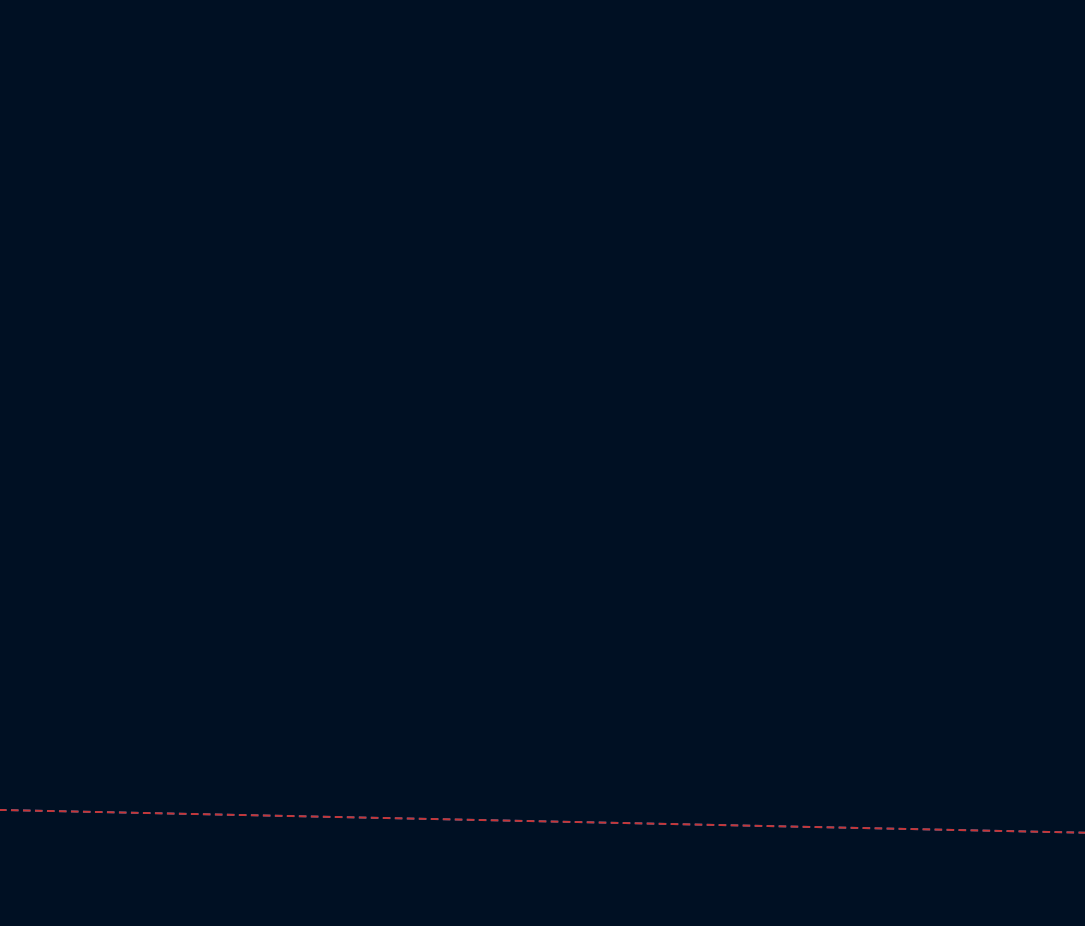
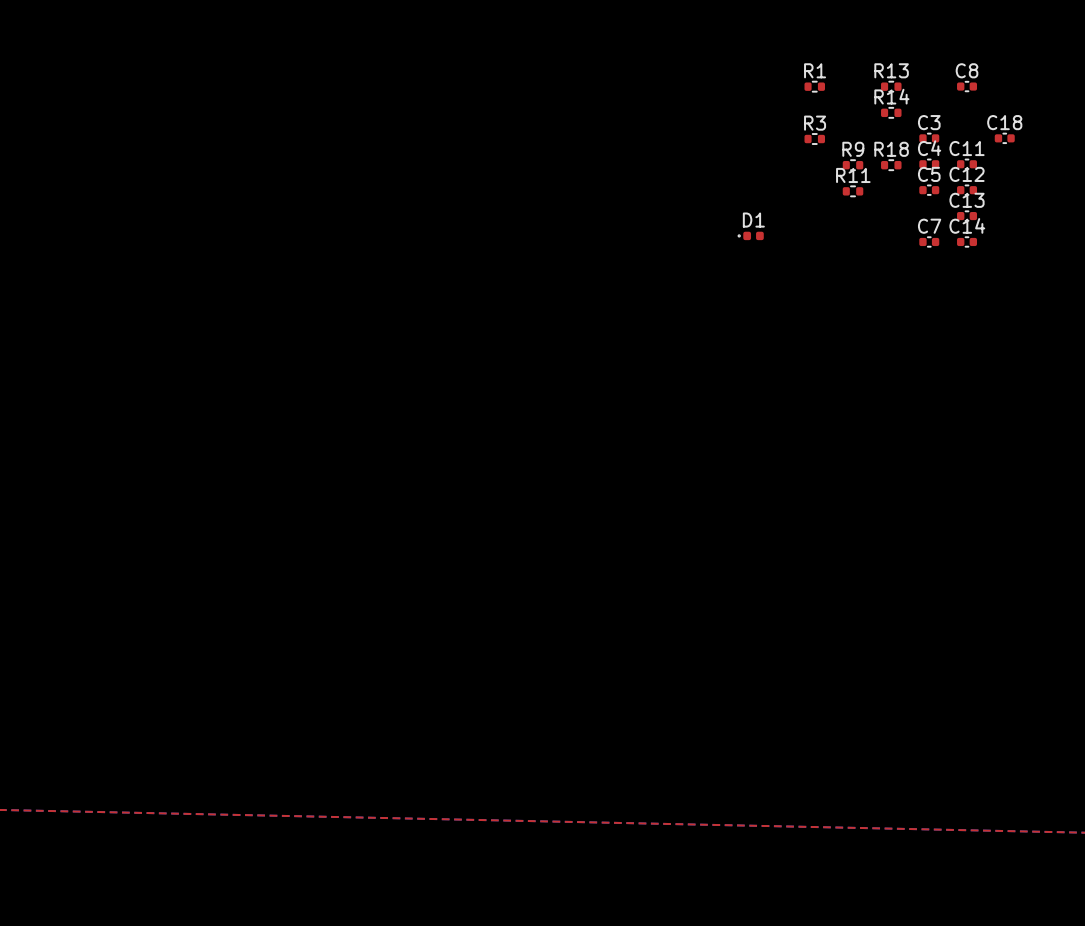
R1: none -> (814, 86)
R13: none -> (891, 86)
C8: none -> (967, 86)
R14: none -> (891, 112)
C3: none -> (929, 138)
C18: none -> (1004, 138)
R3: none -> (814, 139)
C4: none -> (929, 164)
C11: none -> (967, 164)
R9: none -> (853, 165)
R18: none -> (891, 165)
C5: none -> (929, 190)
C12: none -> (967, 190)
R11: none -> (853, 191)
C13: none -> (967, 216)
D1: none -> (750, 235)
C7: none -> (929, 241)
C14: none -> (967, 241)

